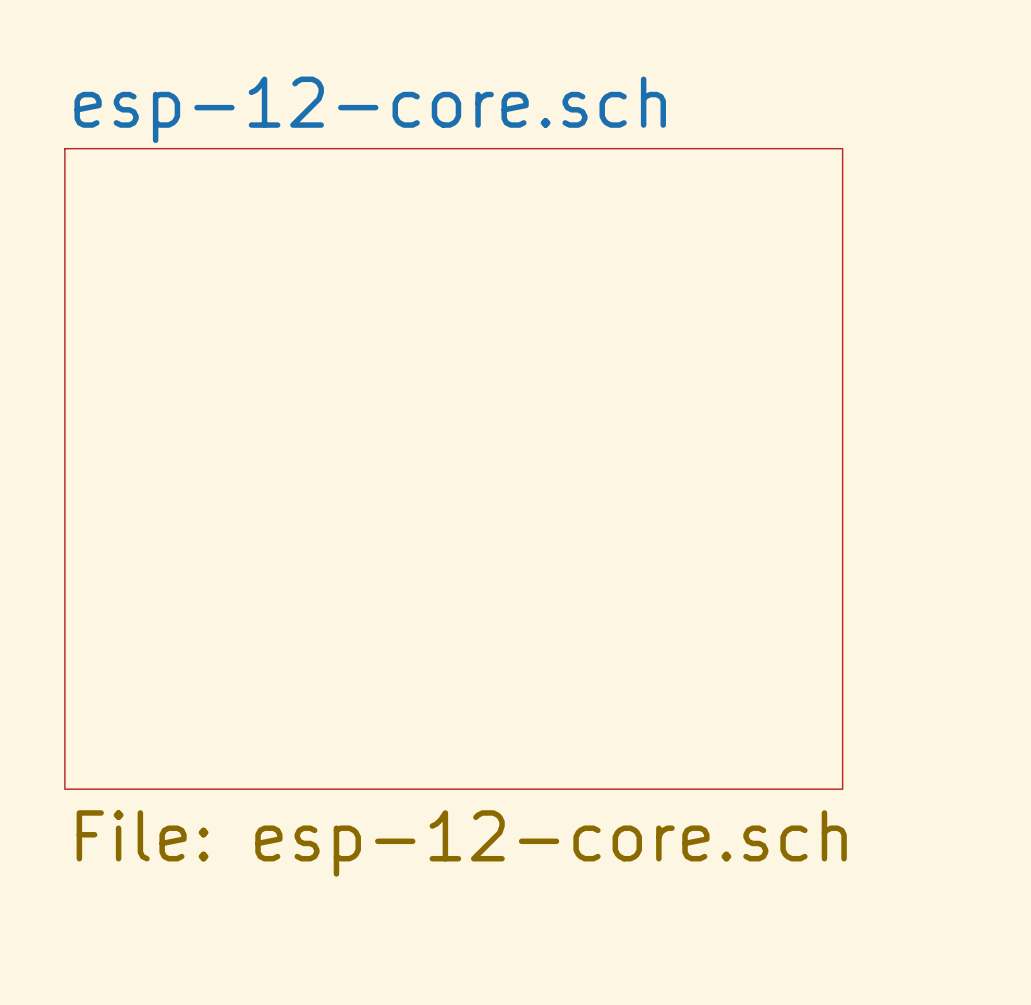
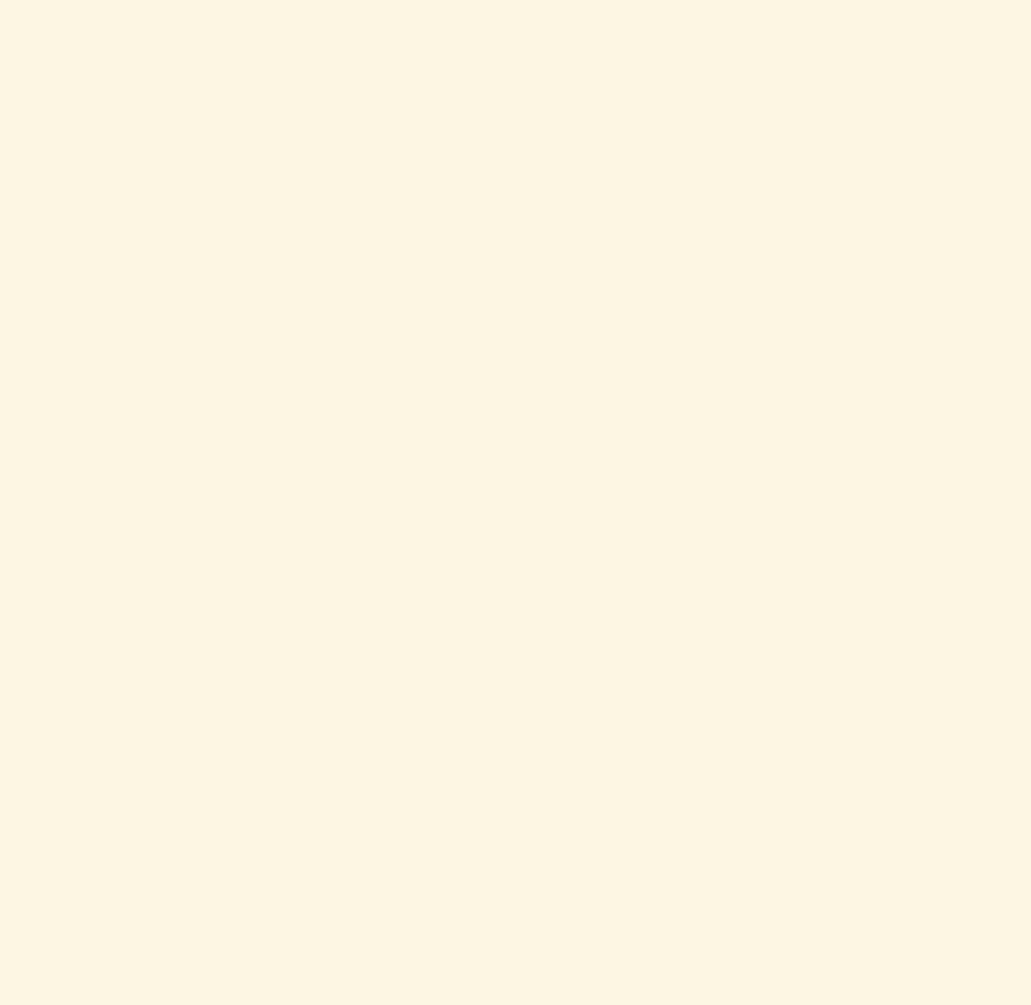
sheet esp-12-core.sch: File: esp-12-core.sch (453, 468) -> none

